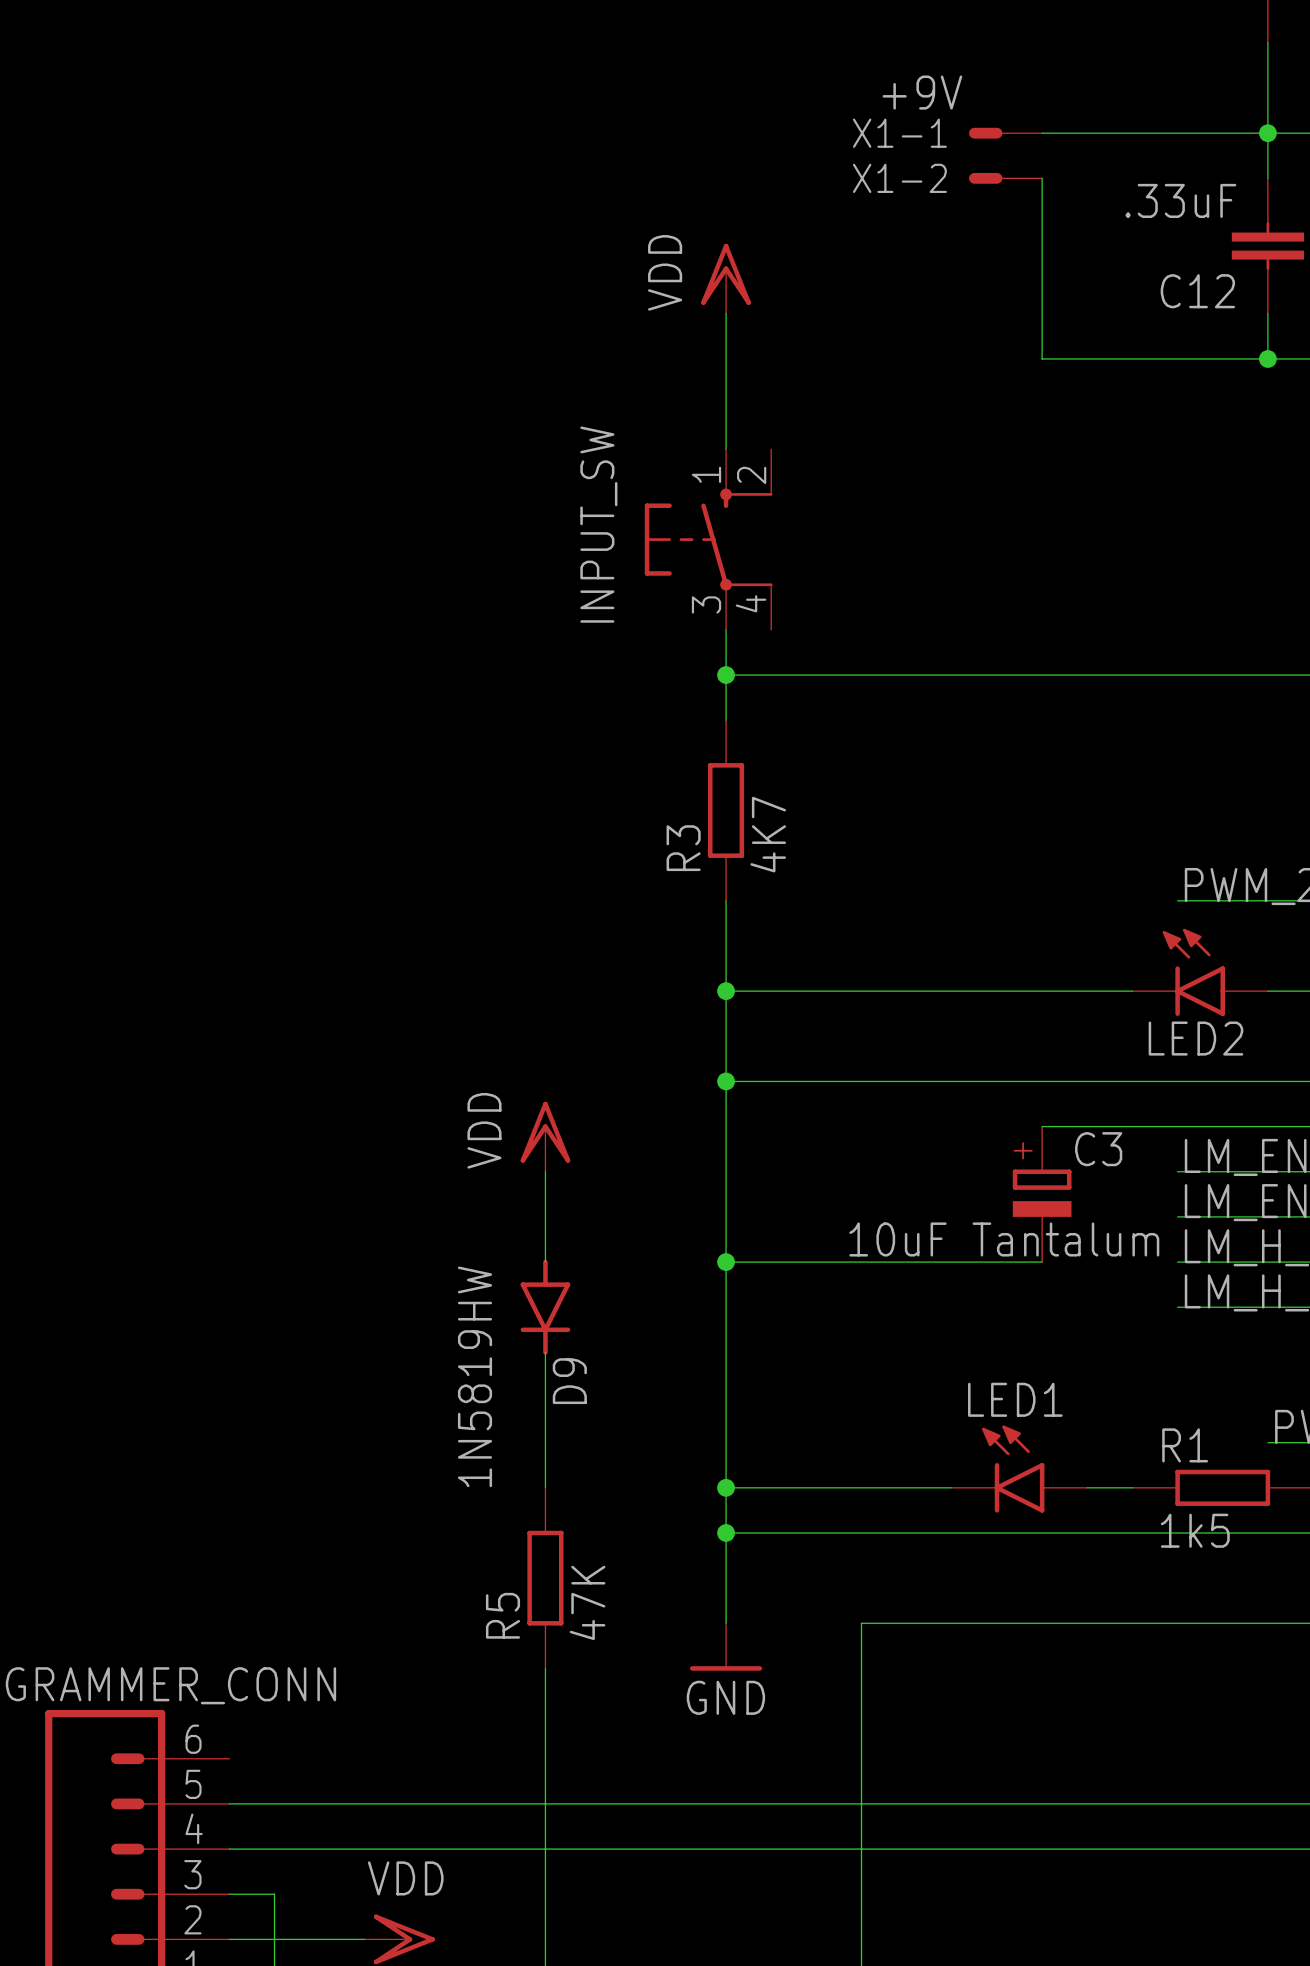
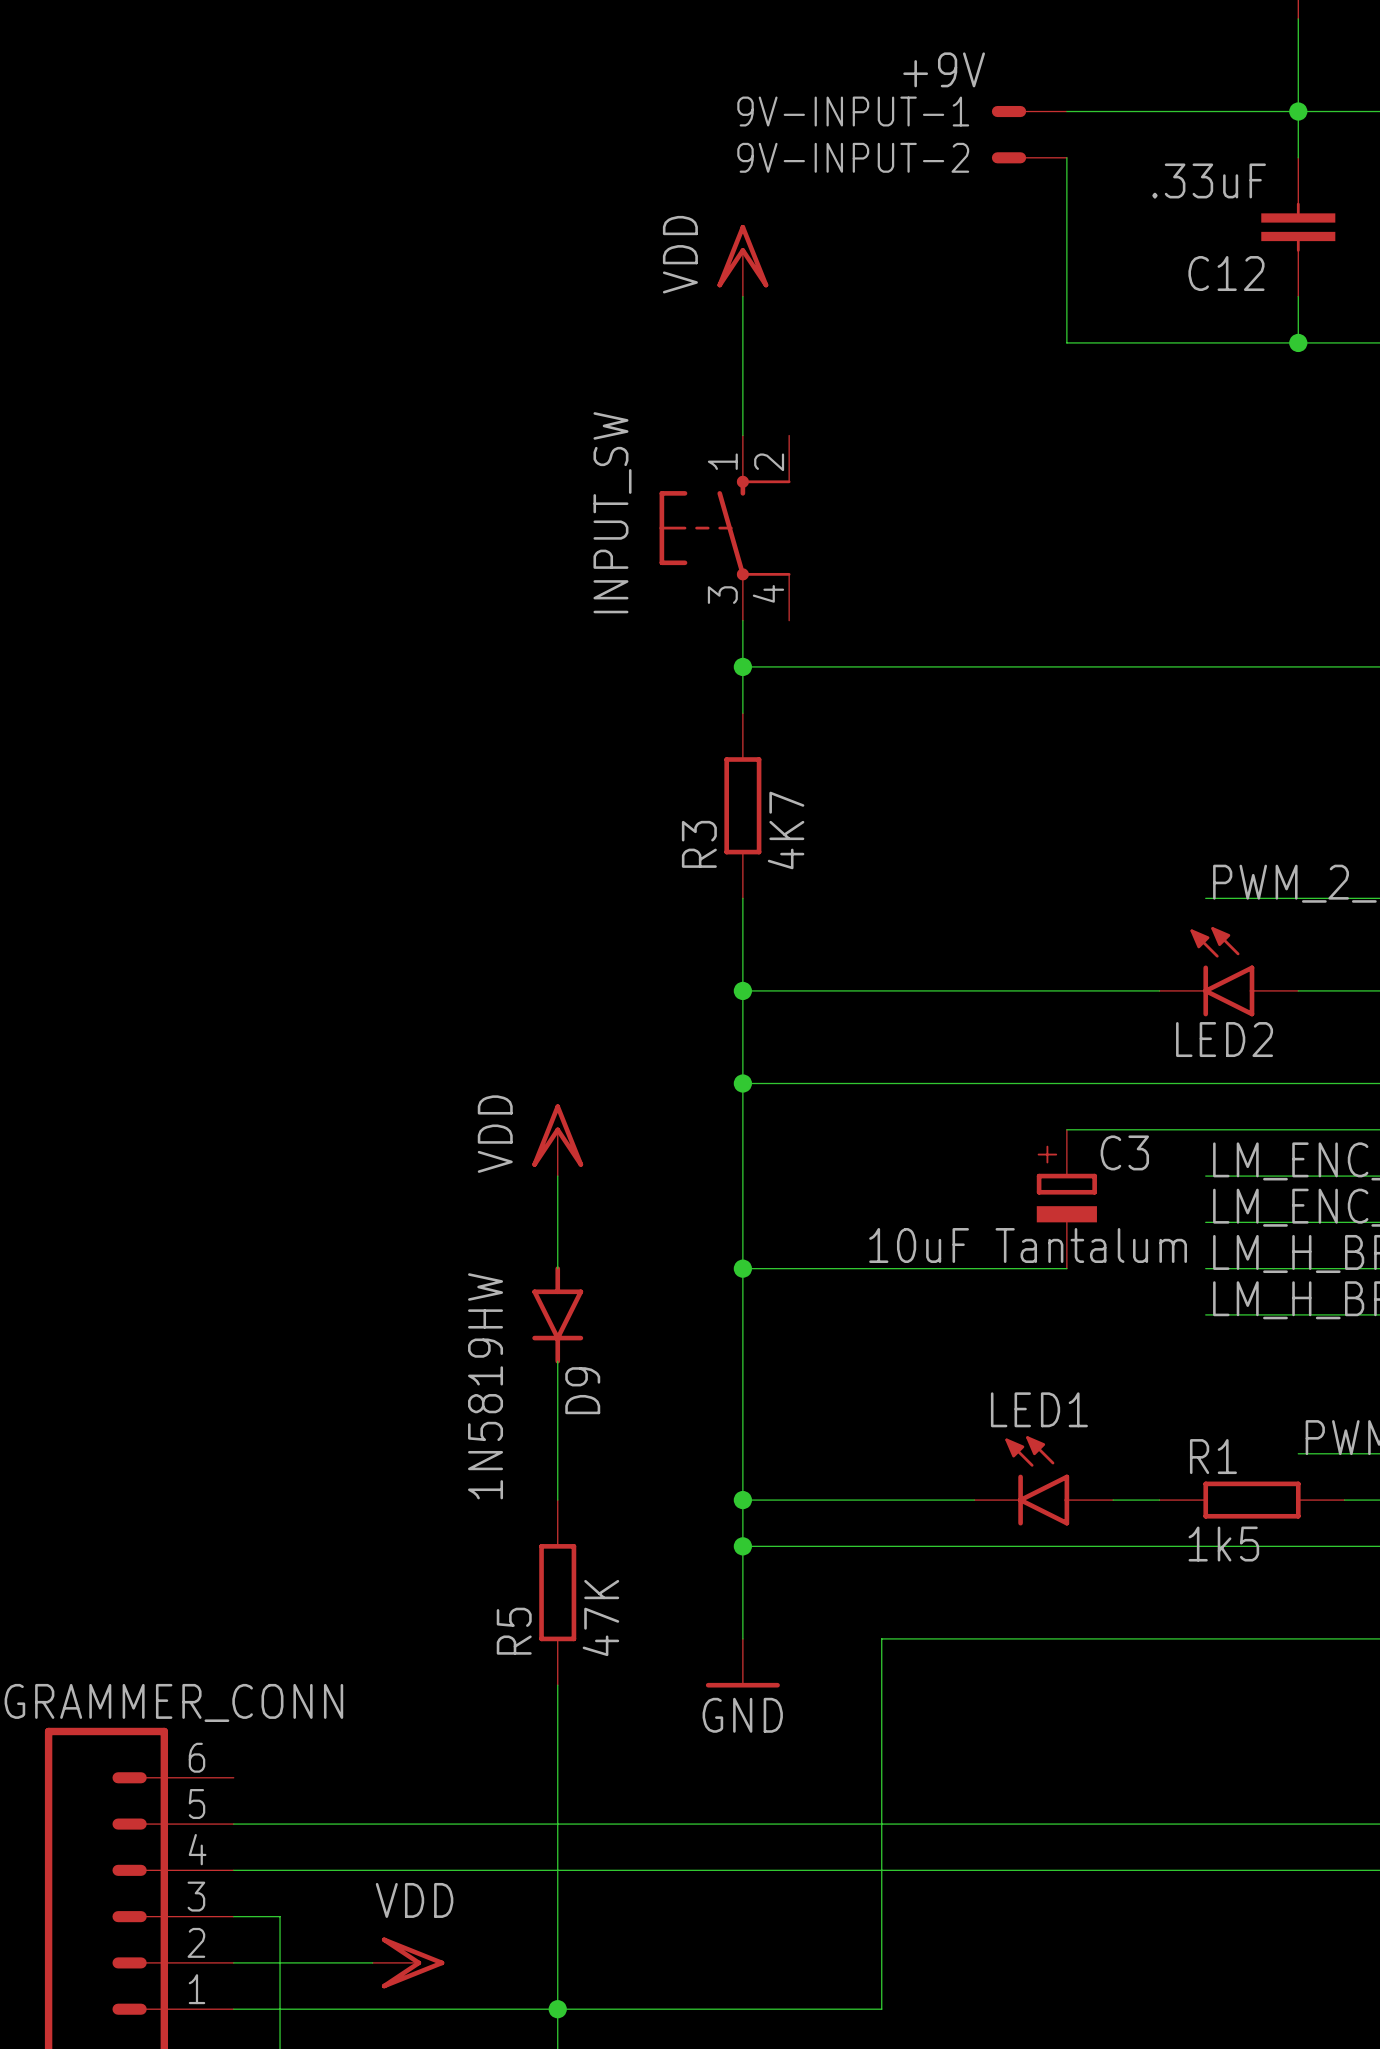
X1-1 name: X1-1 (899, 133) -> 9V-INPUT-1 (853, 111)
X1-2 name: X1-2 (899, 178) -> 9V-INPUT-2 (853, 157)

